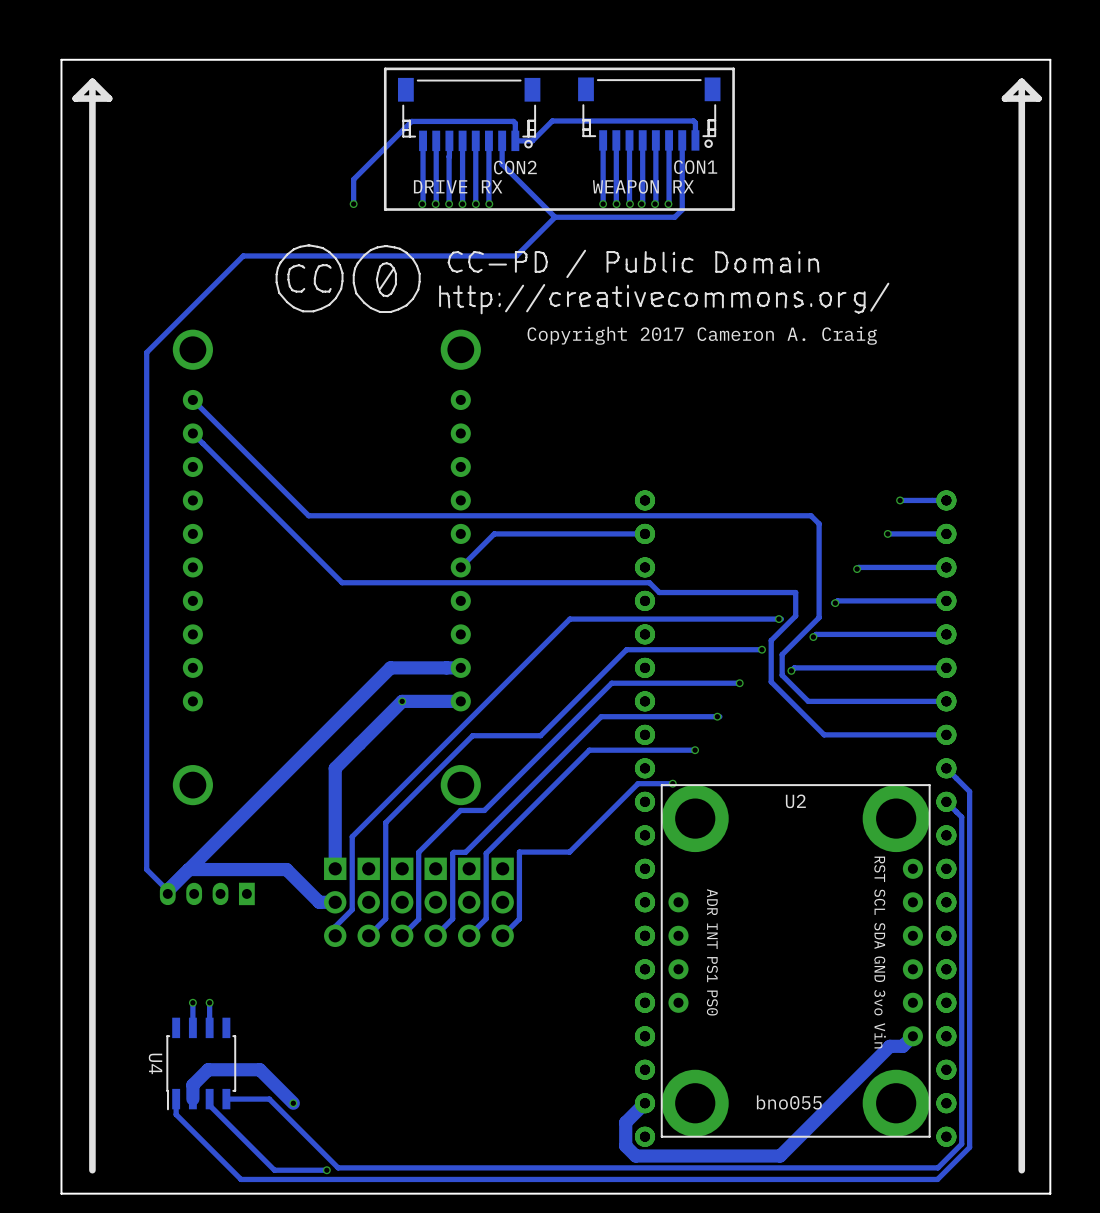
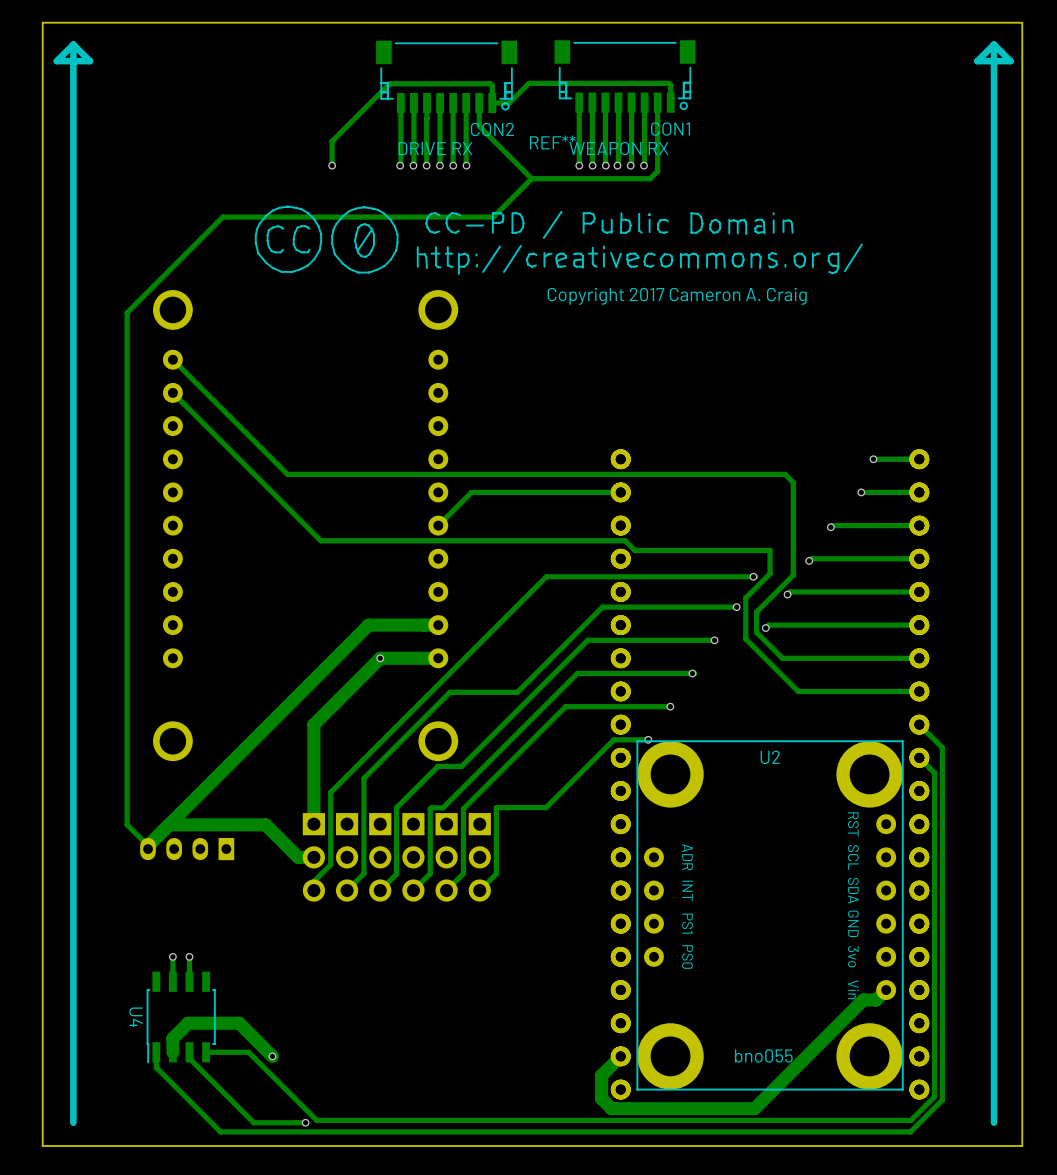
line: (733, 68) (733, 209) (385, 209) (385, 68) (733, 68) -> none
REF**: none -> (558, 240)

